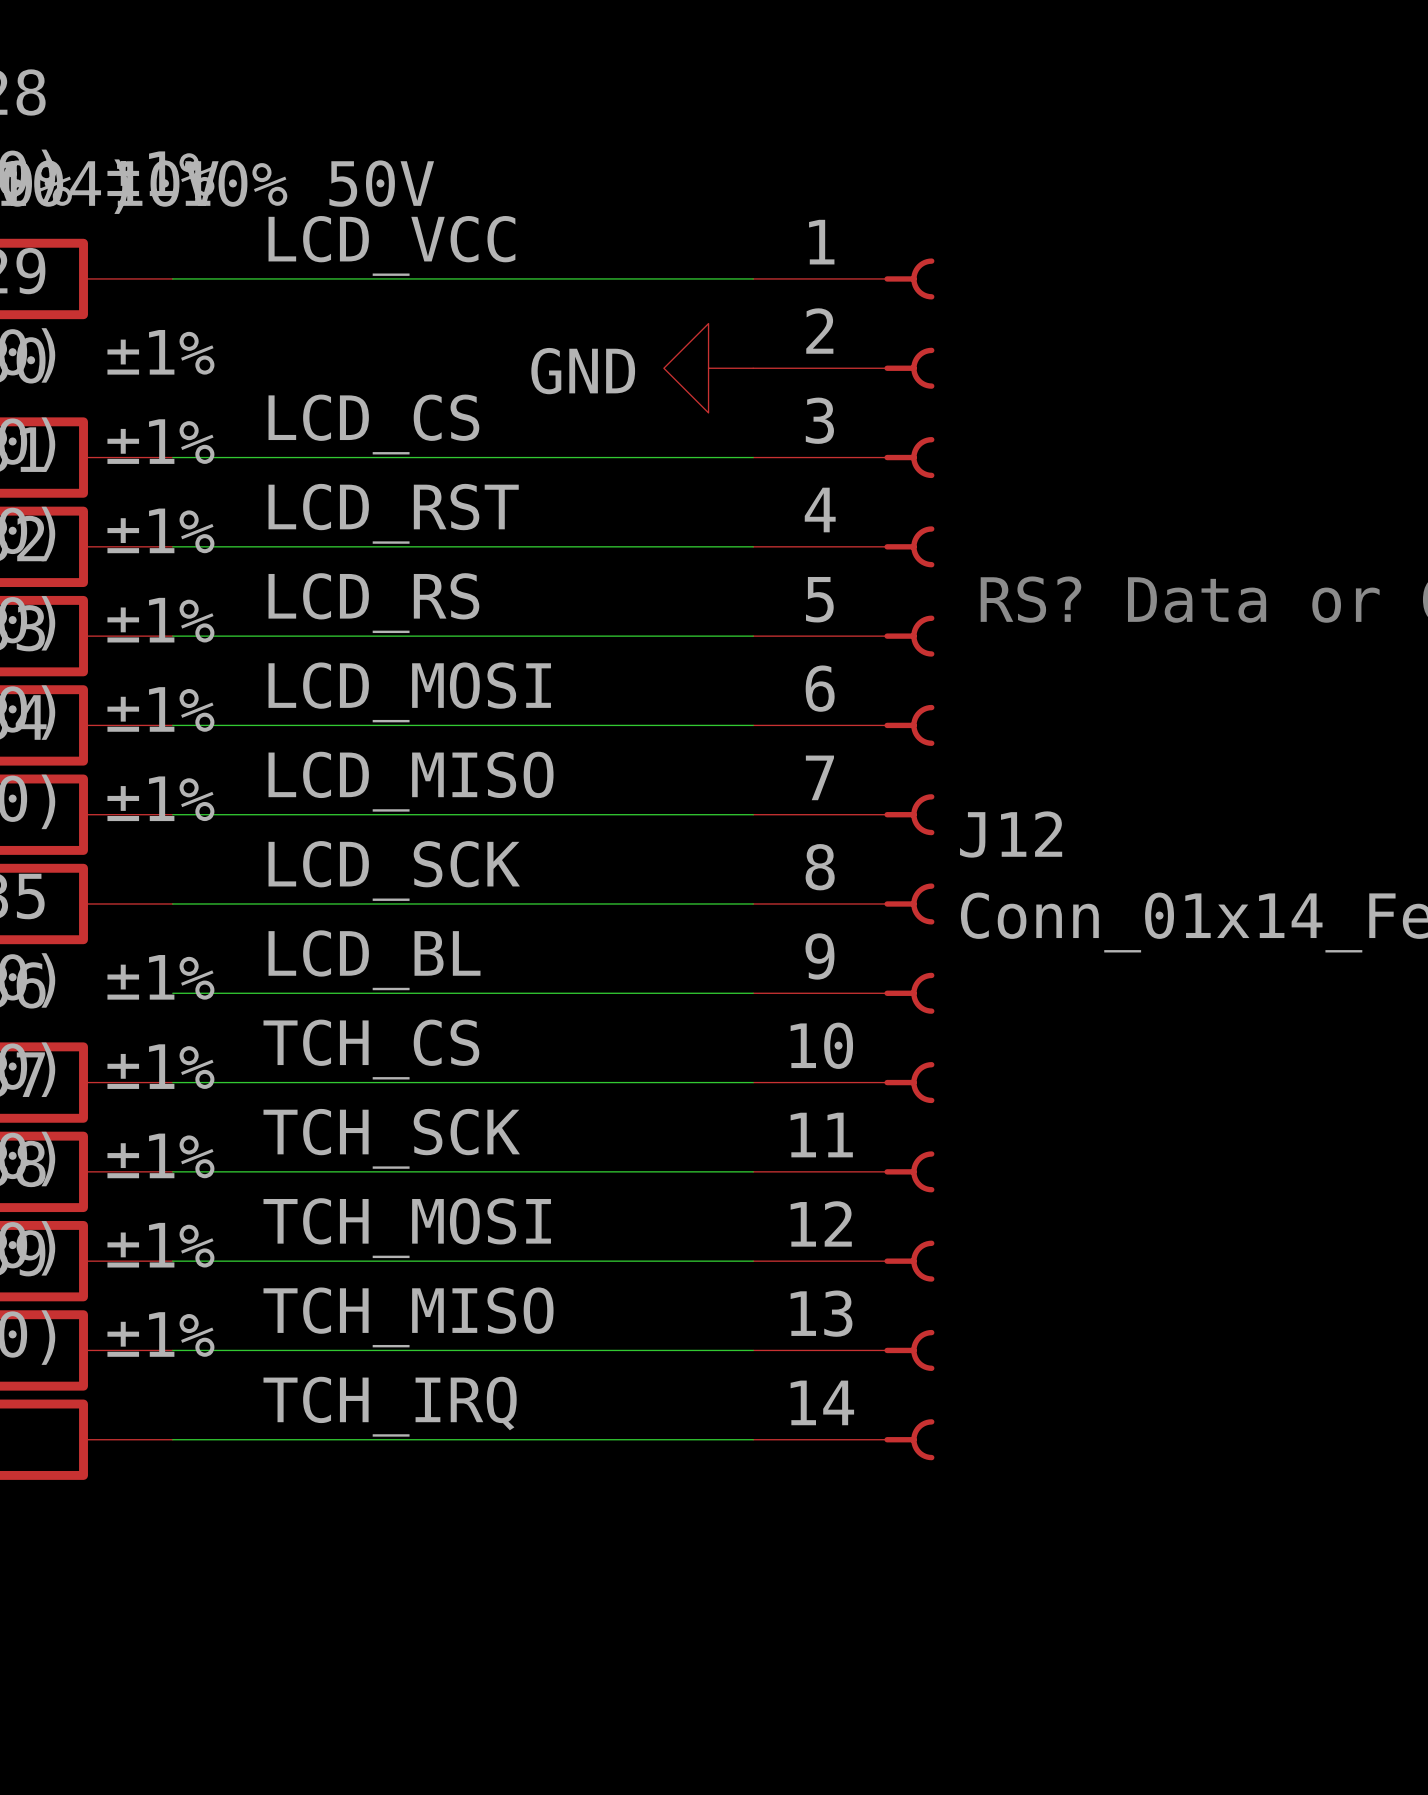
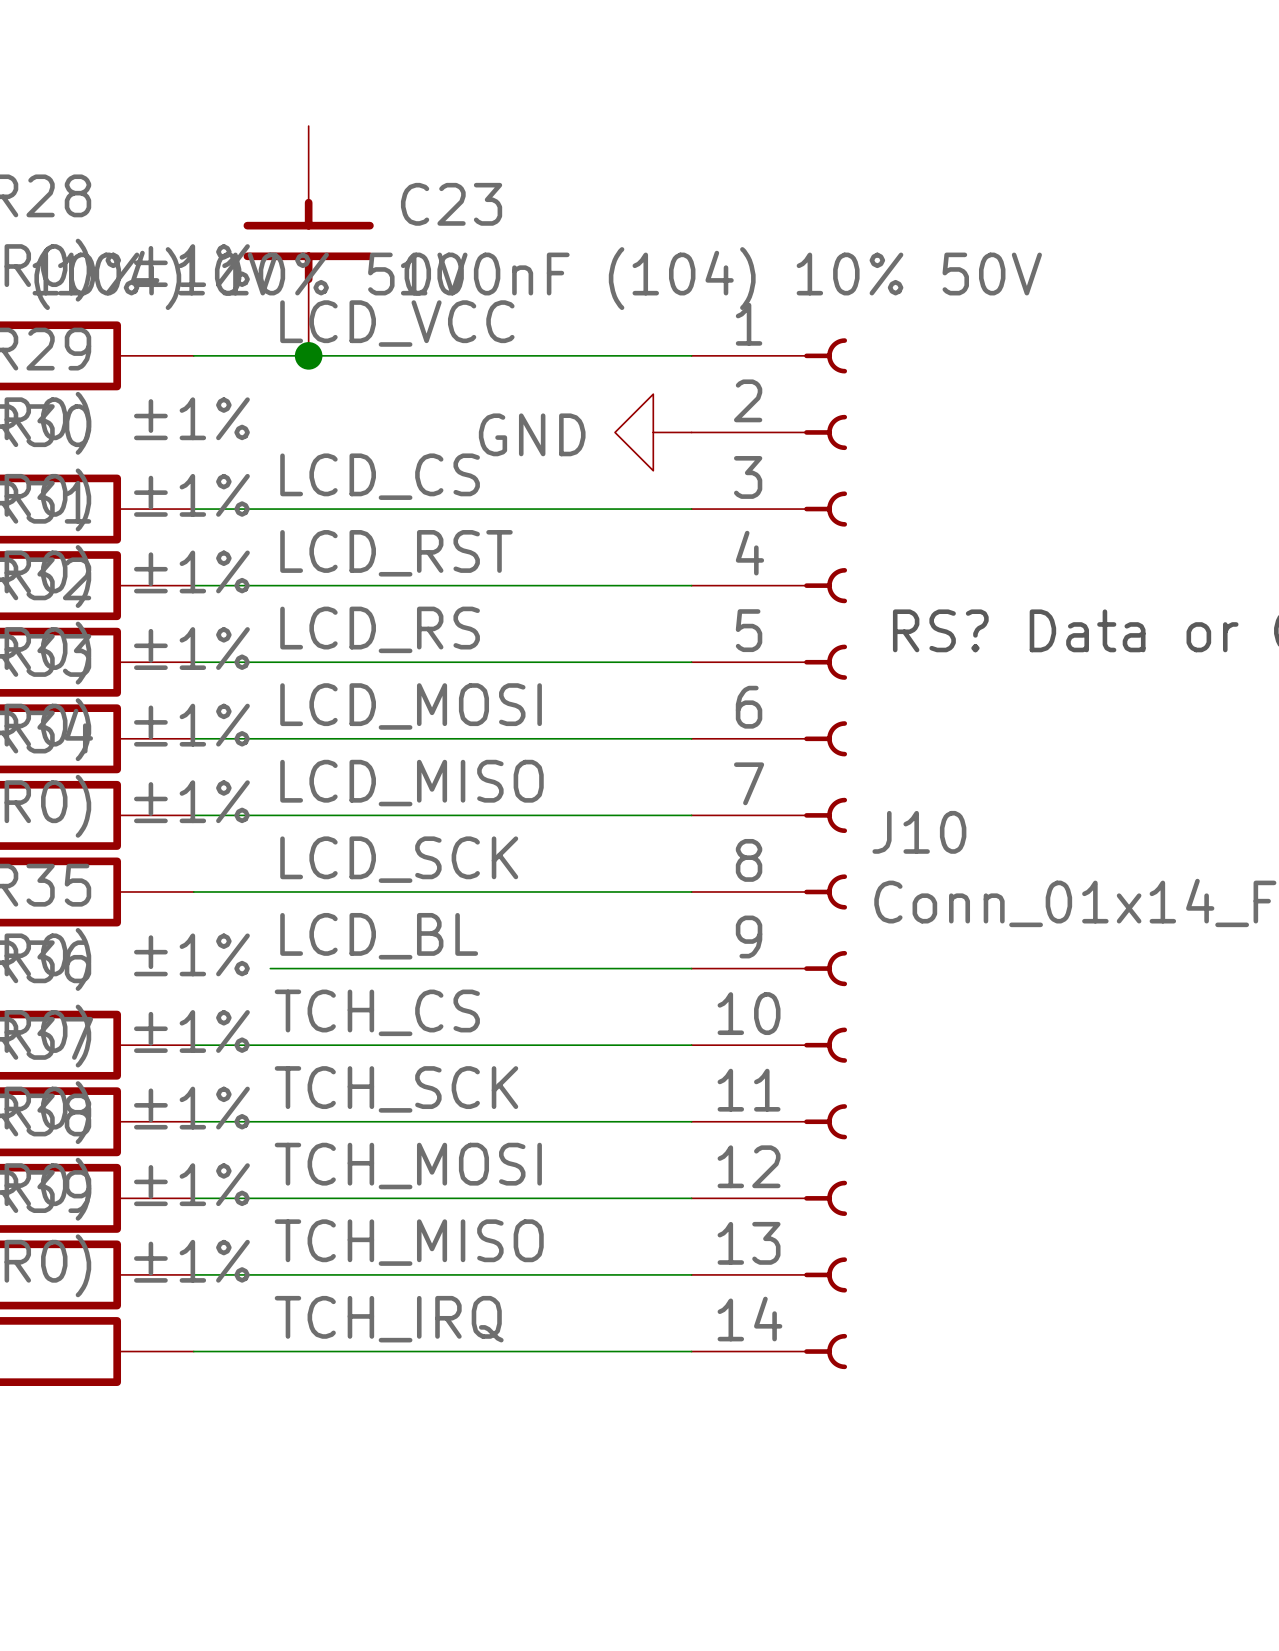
C23: none -> (308, 240)
junction: none -> (308, 355)
J12 name: J12 (1011, 834) -> J10 (919, 832)
wire: (172, 993) (262, 993) -> none

